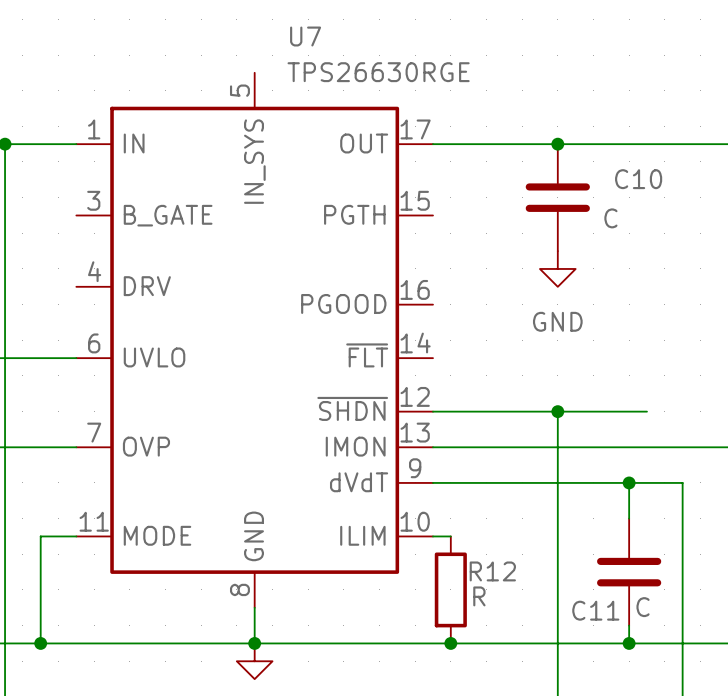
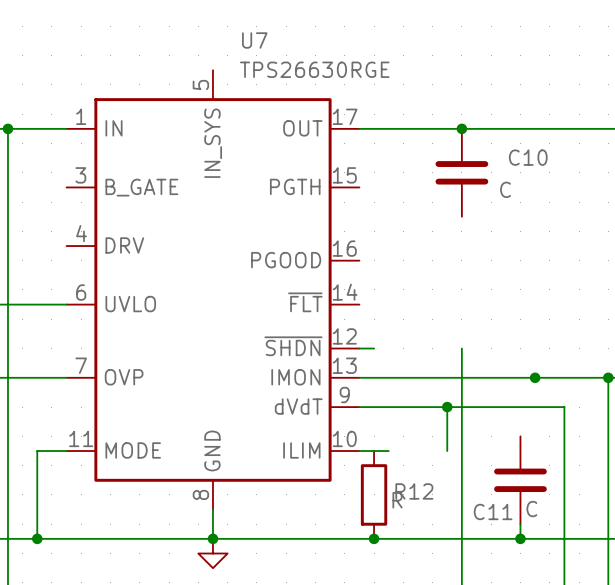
power symbol: GND (557, 268) -> none
wire: (450, 411) (646, 411) -> none
junction: (557, 411) -> none
wire: none -> (447, 407) (447, 451)
junction: none -> (447, 407)
wire: (629, 482) (629, 518) -> none
junction position: (629, 482) -> (535, 377)
wire: none -> (374, 451) (388, 451)
R12 name position: R12 (492, 571) -> R12 (414, 491)

